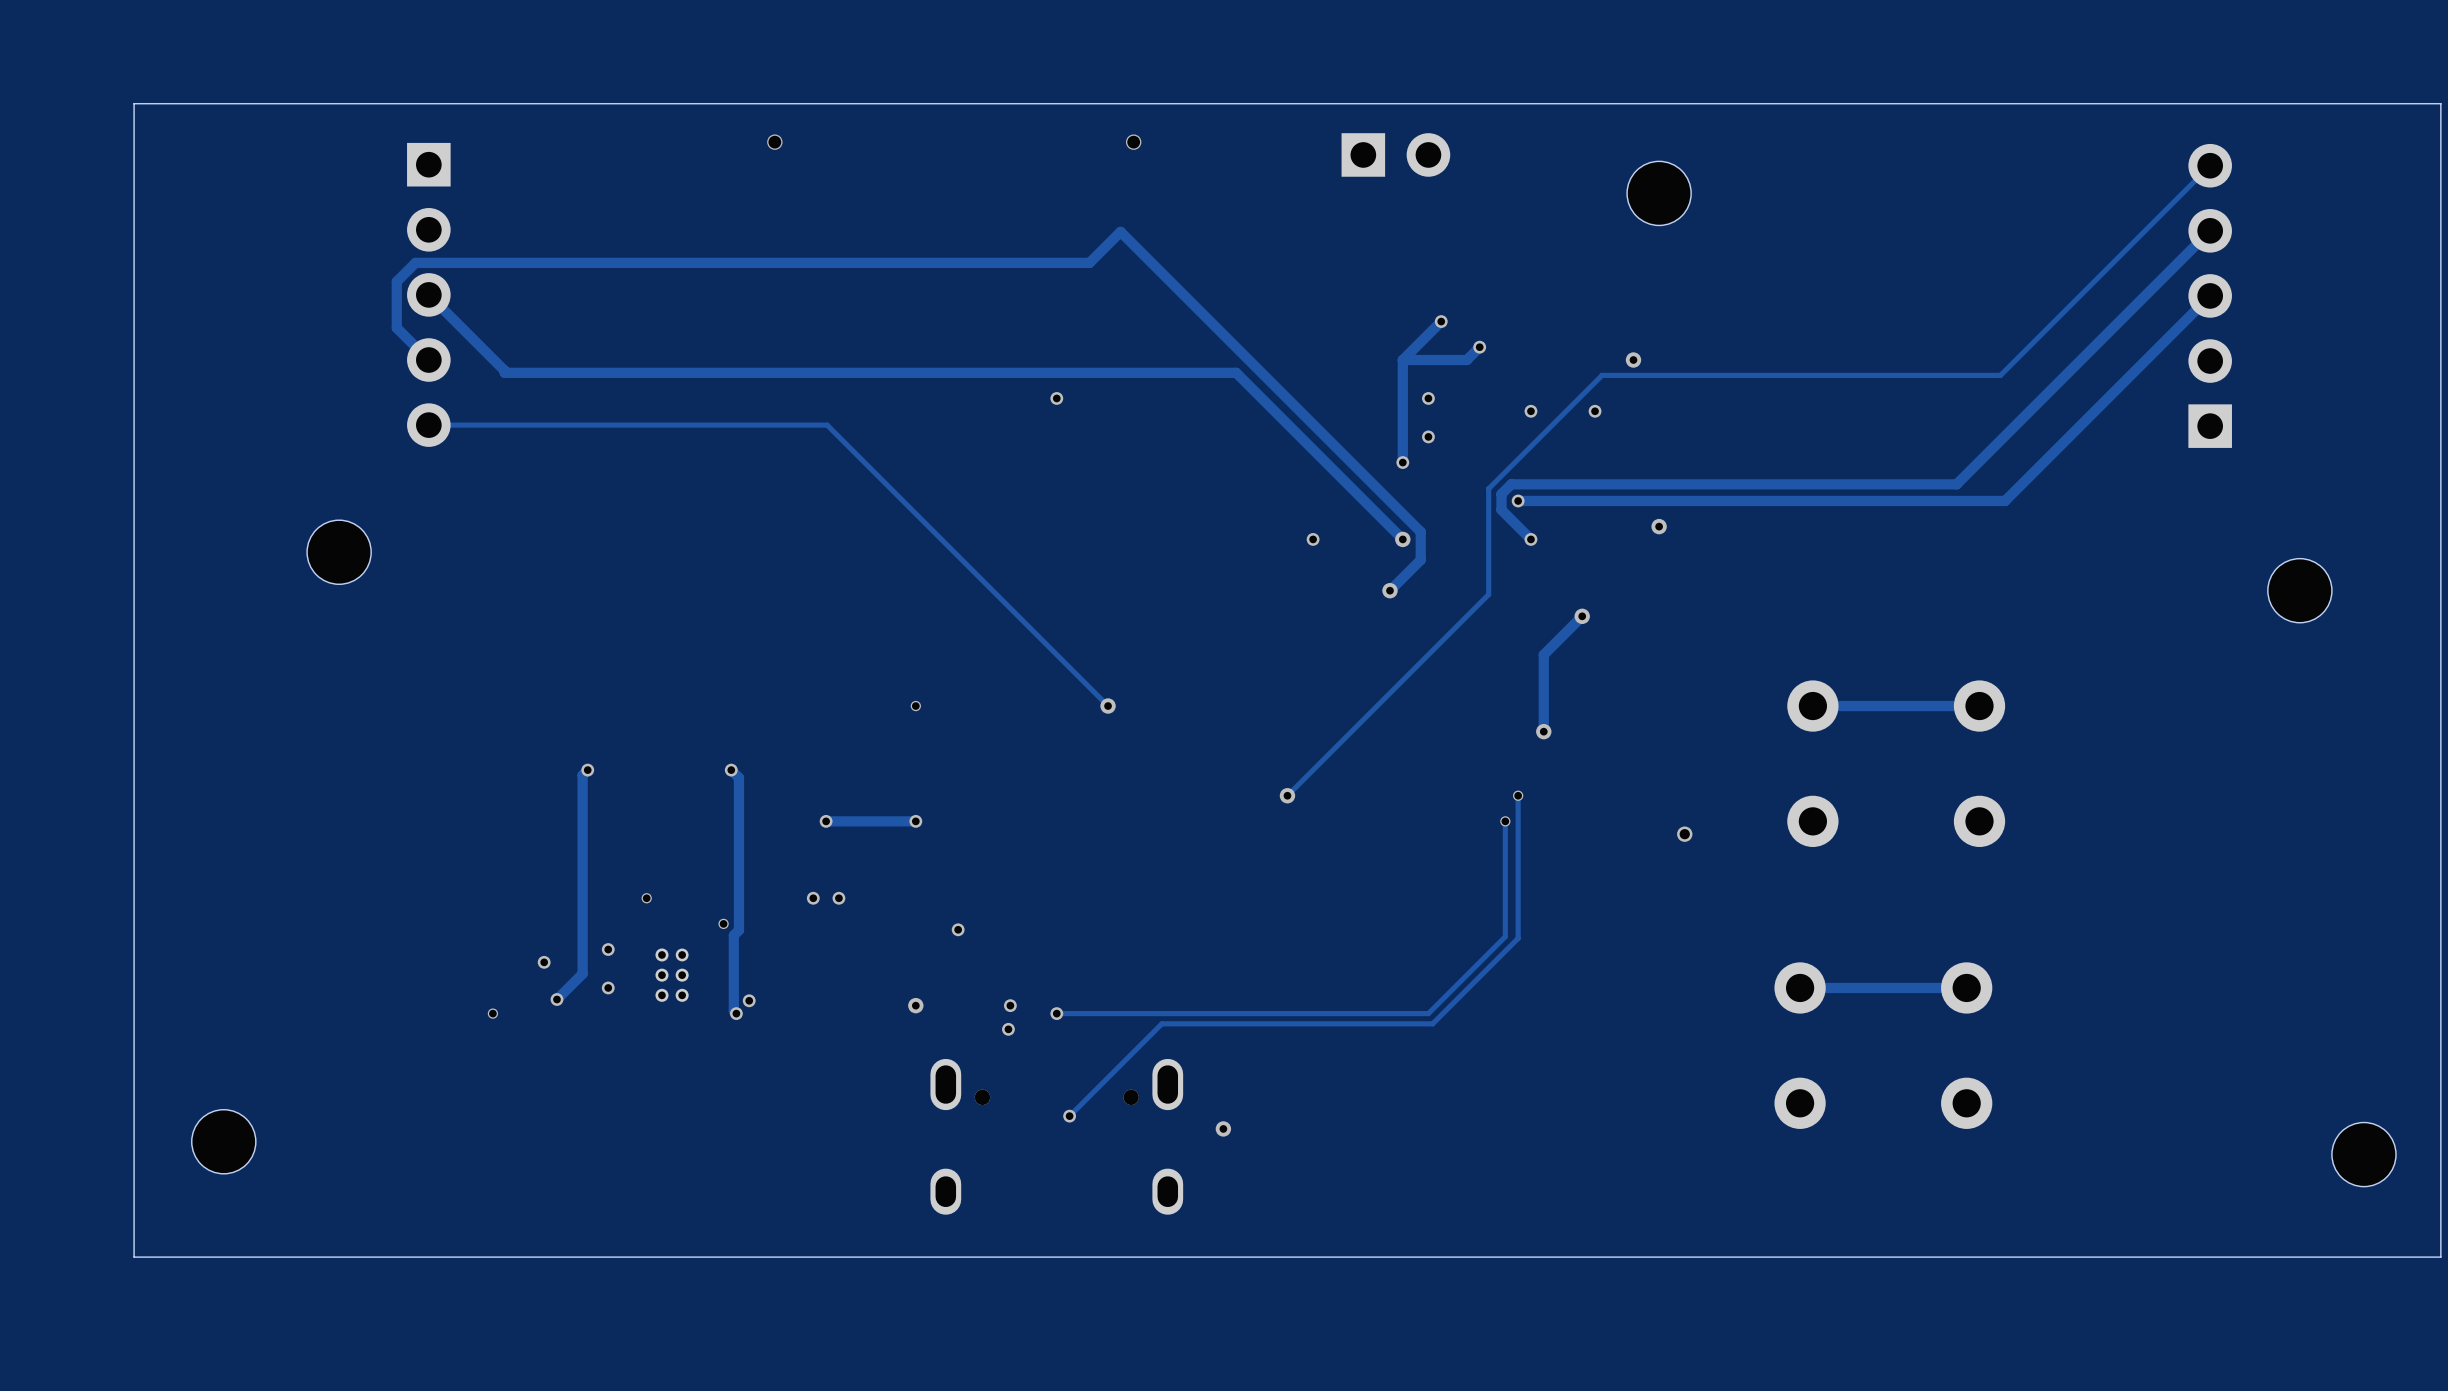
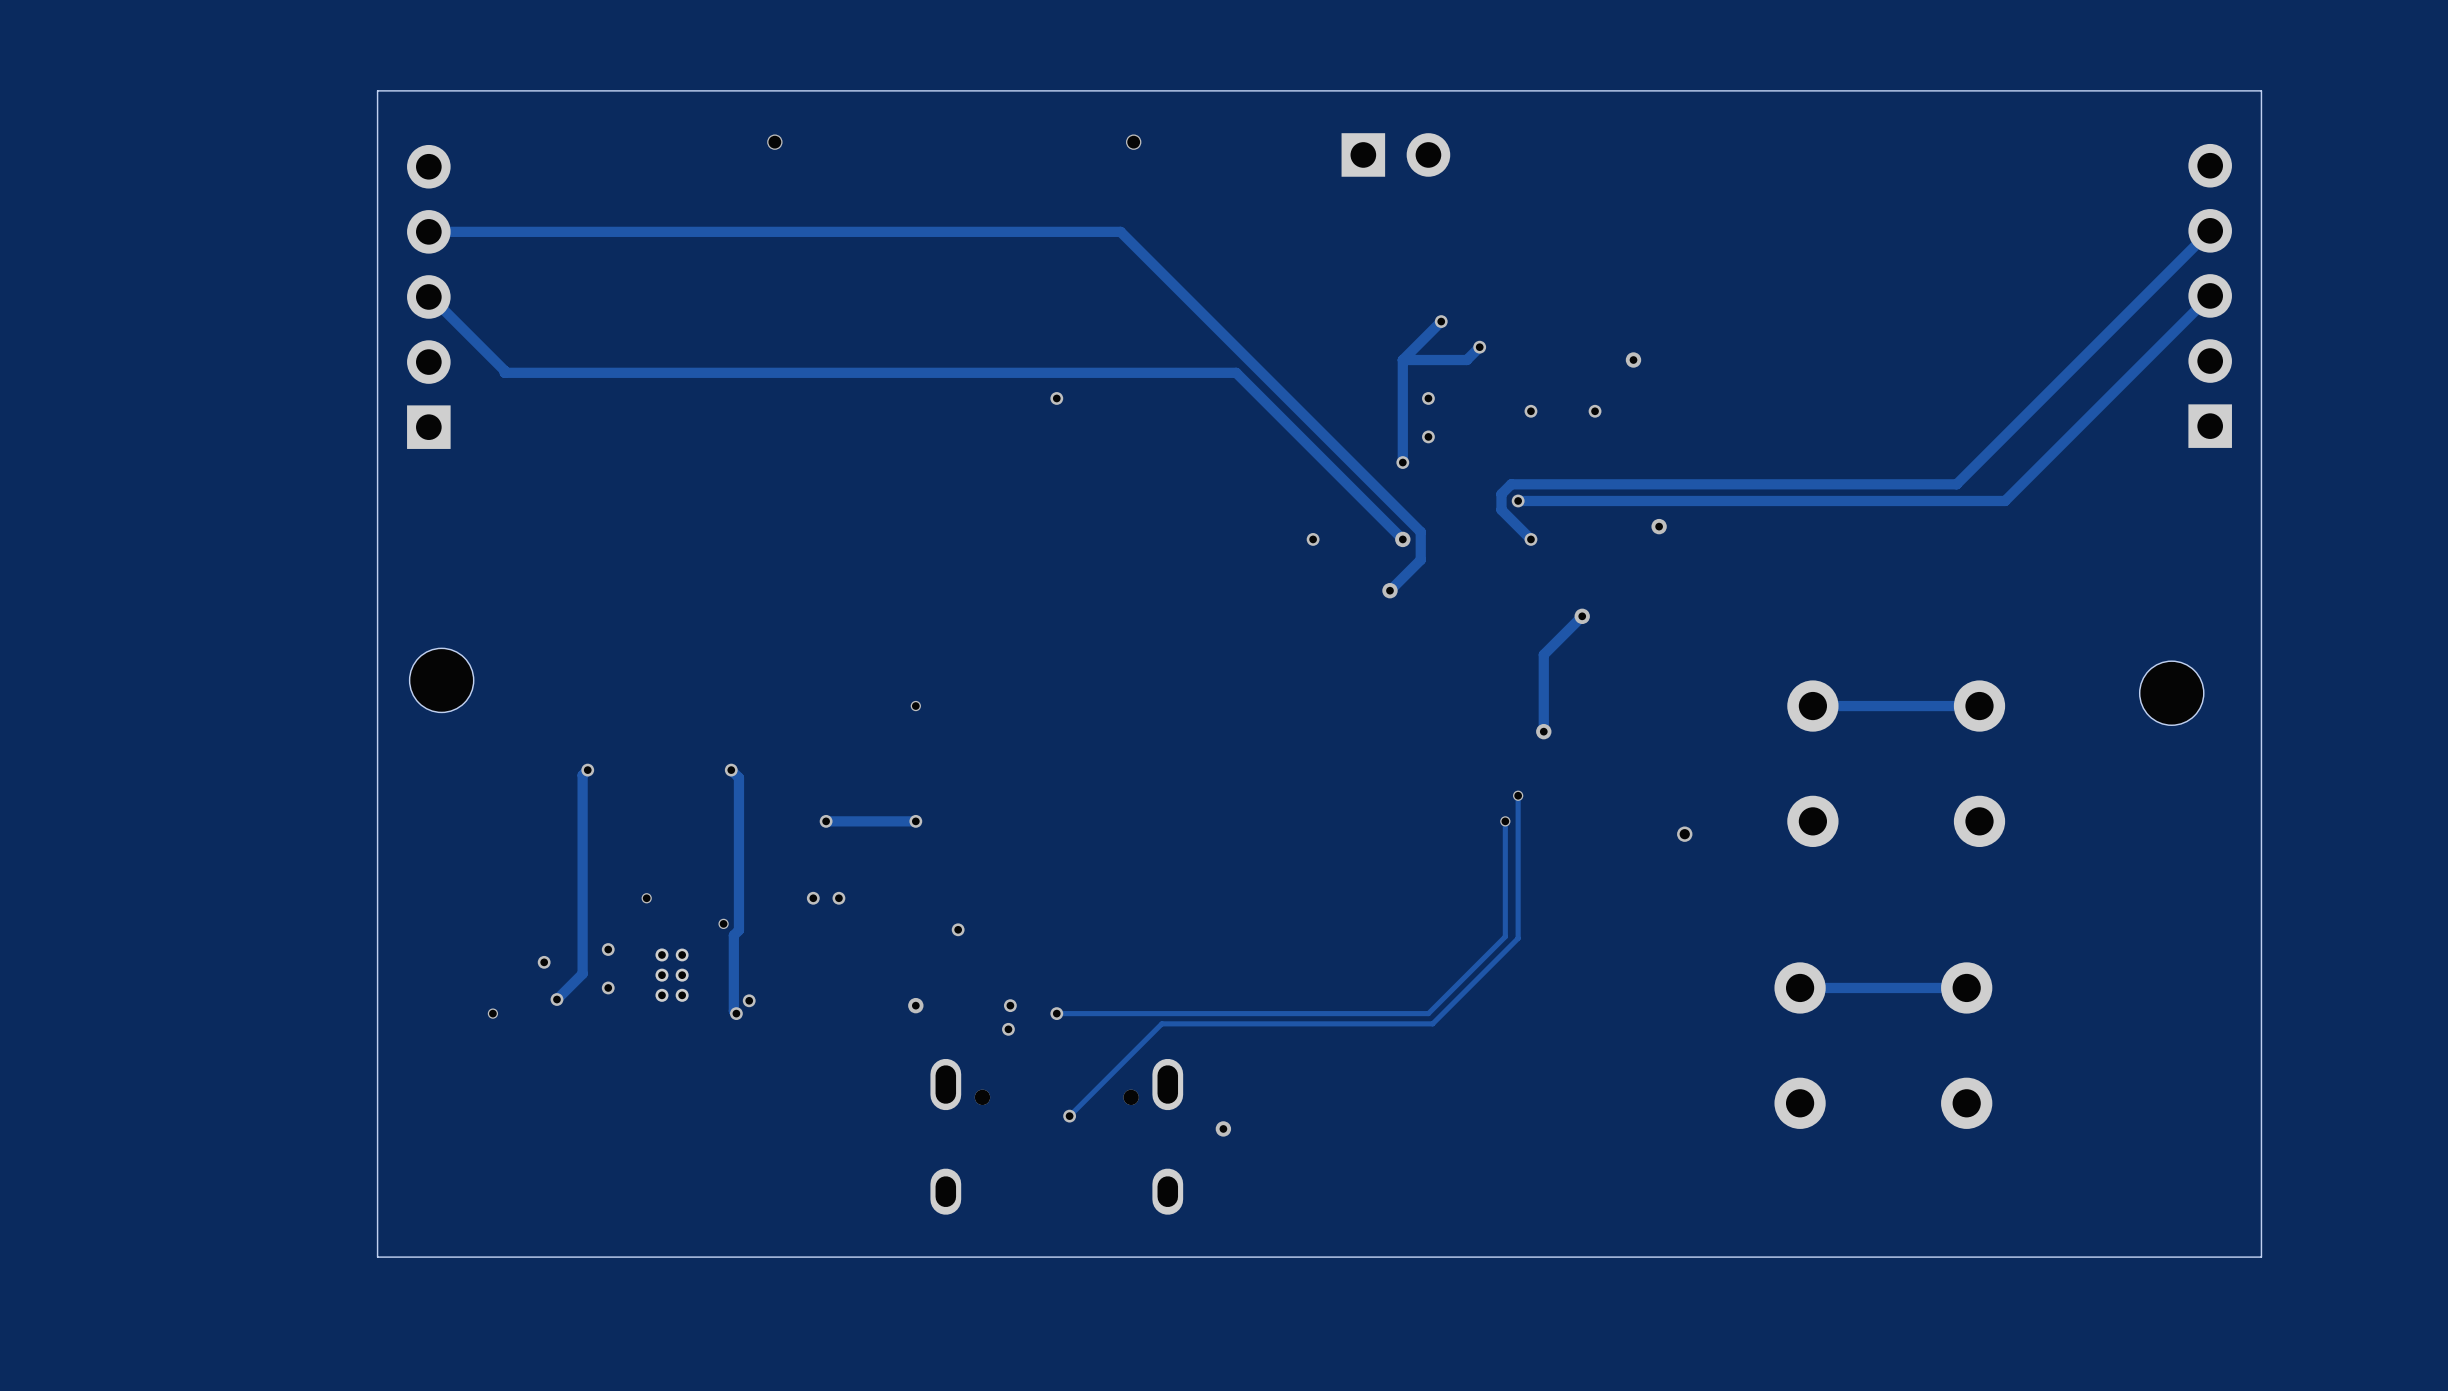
track: (2210, 165) (2000, 375) (1602, 375) (1488, 488) (1488, 594) (1287, 795) -> none
part: (1659, 193) -> none
track: (1120, 231) (1089, 262) (415, 262) (396, 281) (396, 327) (428, 360) -> (1120, 231) (428, 231)
part rotation: 0° (428, 294) -> 180° (428, 296)
track: (428, 425) (827, 425) (1108, 706) -> none
part position: (339, 552) -> (441, 680)
part position: (2299, 590) -> (2171, 693)
via: (1108, 706) -> none
via: (1287, 795) -> none
part: (223, 1141) -> none
part: (2363, 1154) -> none
board edge: (2261, 1257) (2440, 1257) (2440, 103) (134, 103) (134, 1257) (377, 1257) -> (2261, 1257) (2261, 90) (377, 90) (377, 1257)

